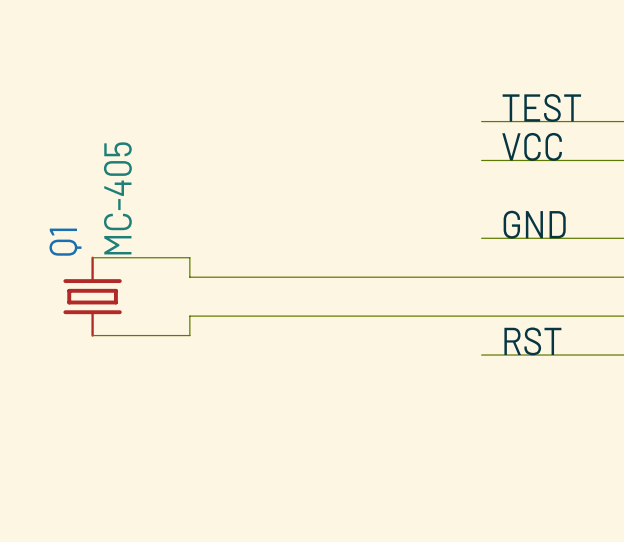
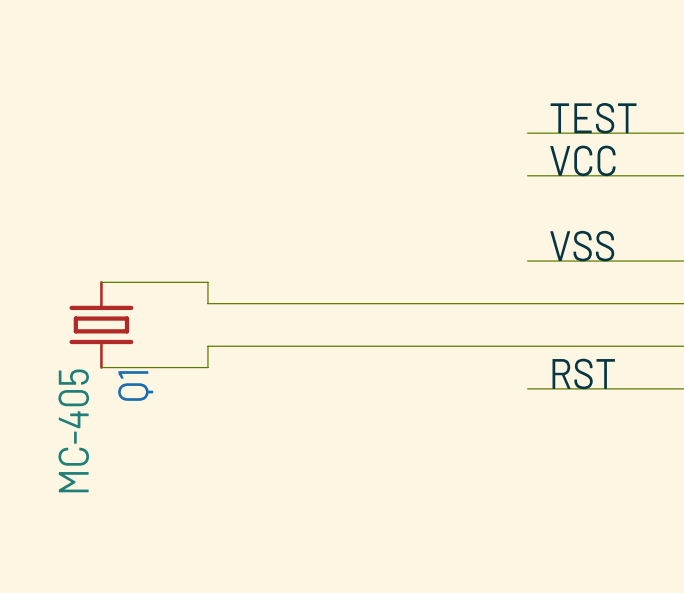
Q1 value position: MC-405 (117, 198) -> MC-405 (73, 430)
label: GND (534, 224) -> VSS (582, 246)
Q1 name position: Q1 (65, 242) -> Q1 (135, 386)

